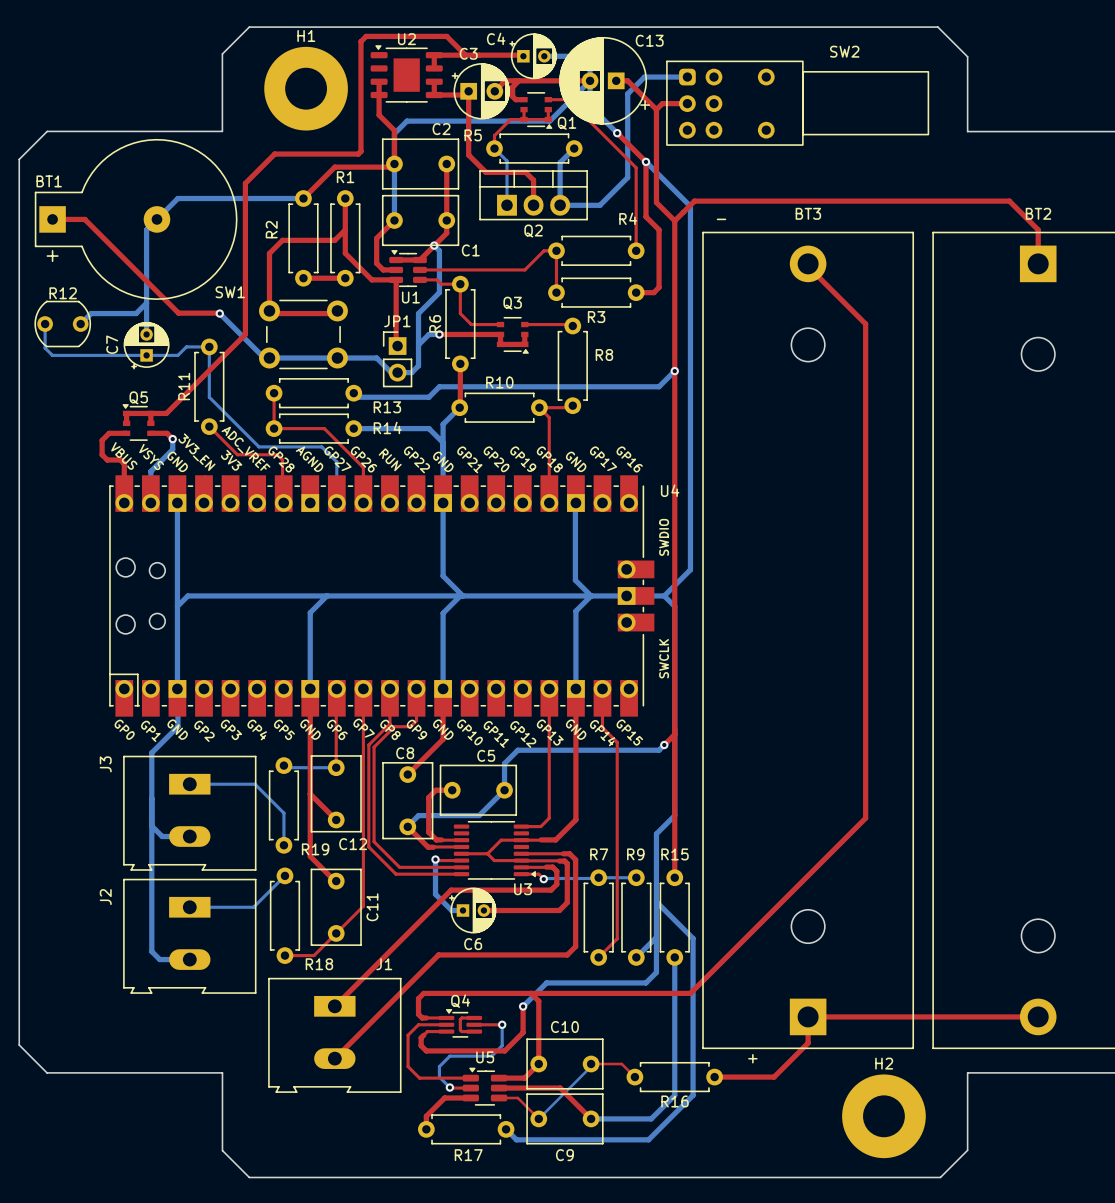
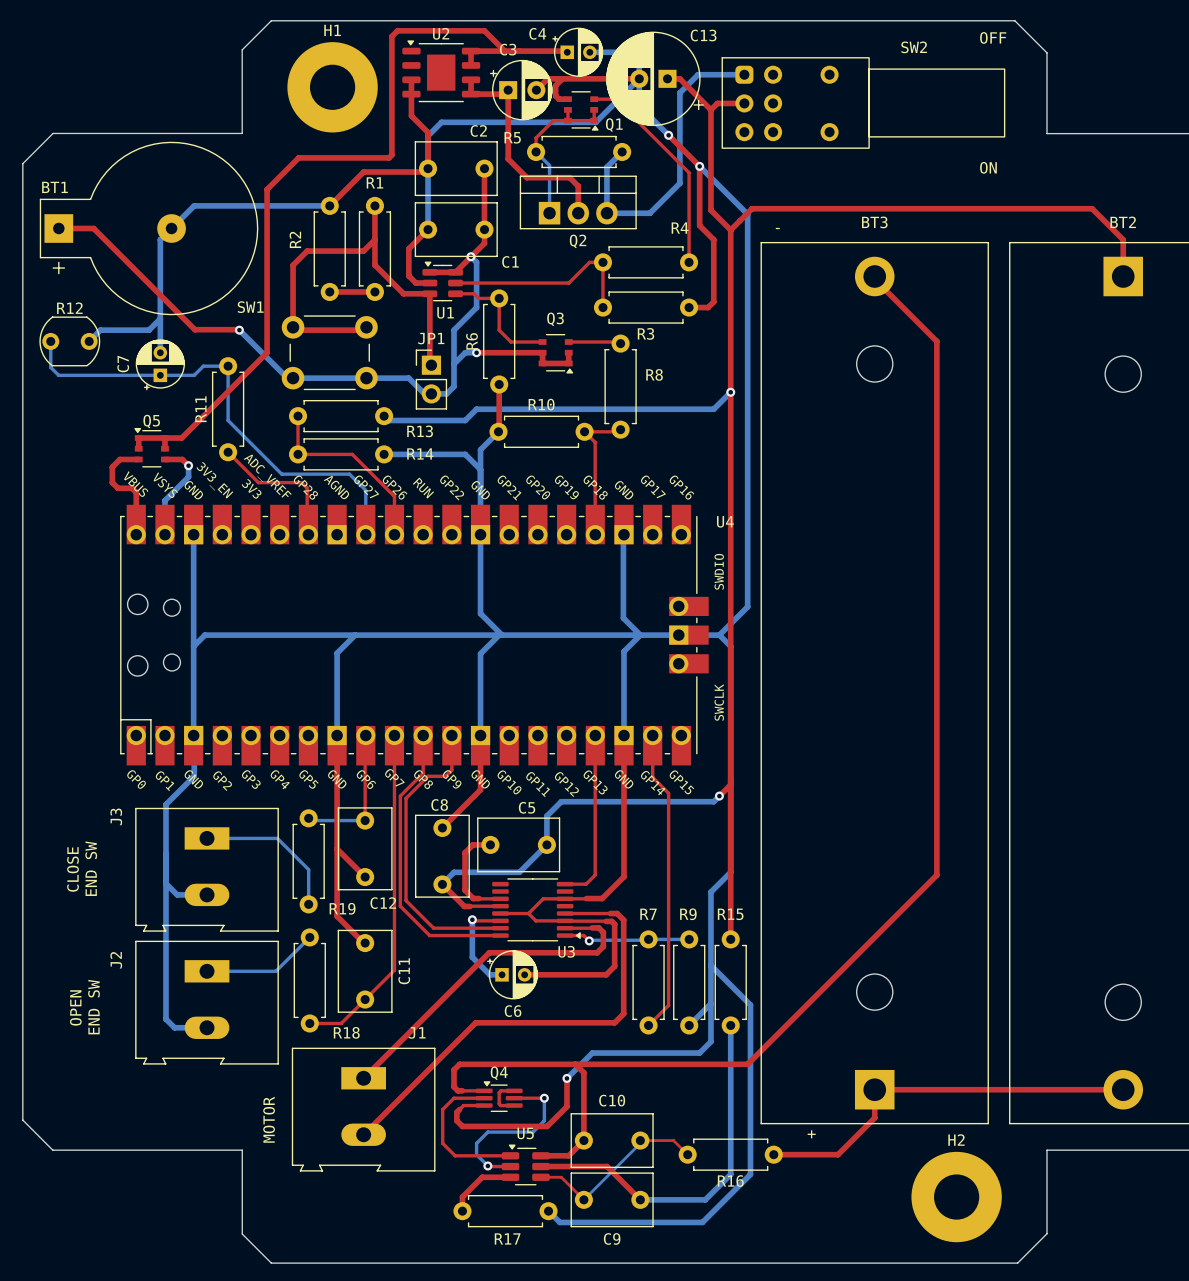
text: none -> OFF (993, 37)
text: none -> ON (988, 167)
text: none -> CLOSE (73, 869)
text: none -> END SW (91, 868)
text: none -> END SW (94, 1007)
text: none -> OPEN (75, 1007)
text: none -> MOTOR (269, 1119)

